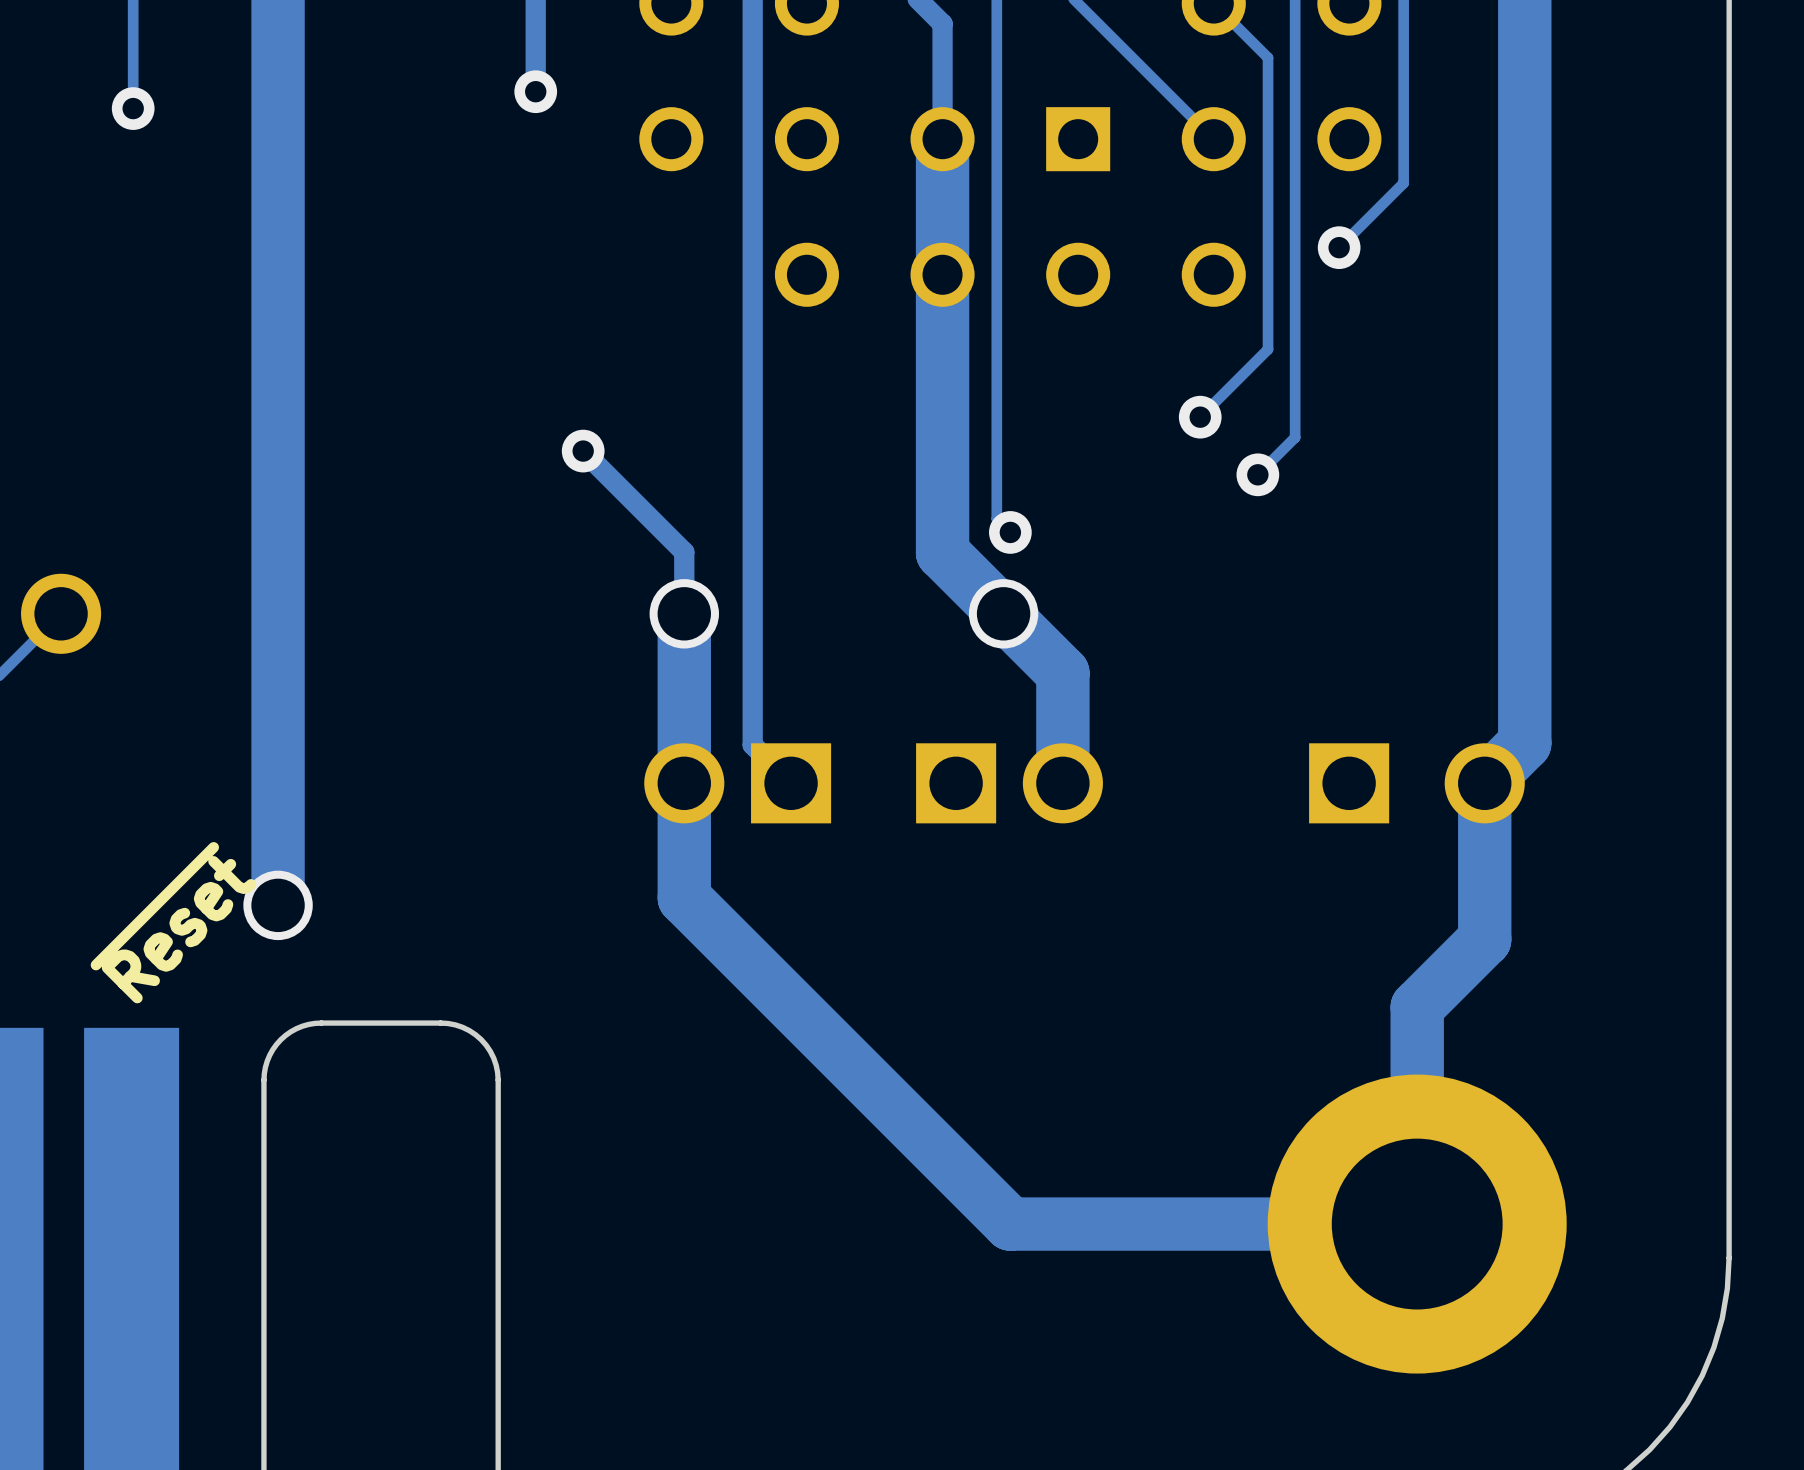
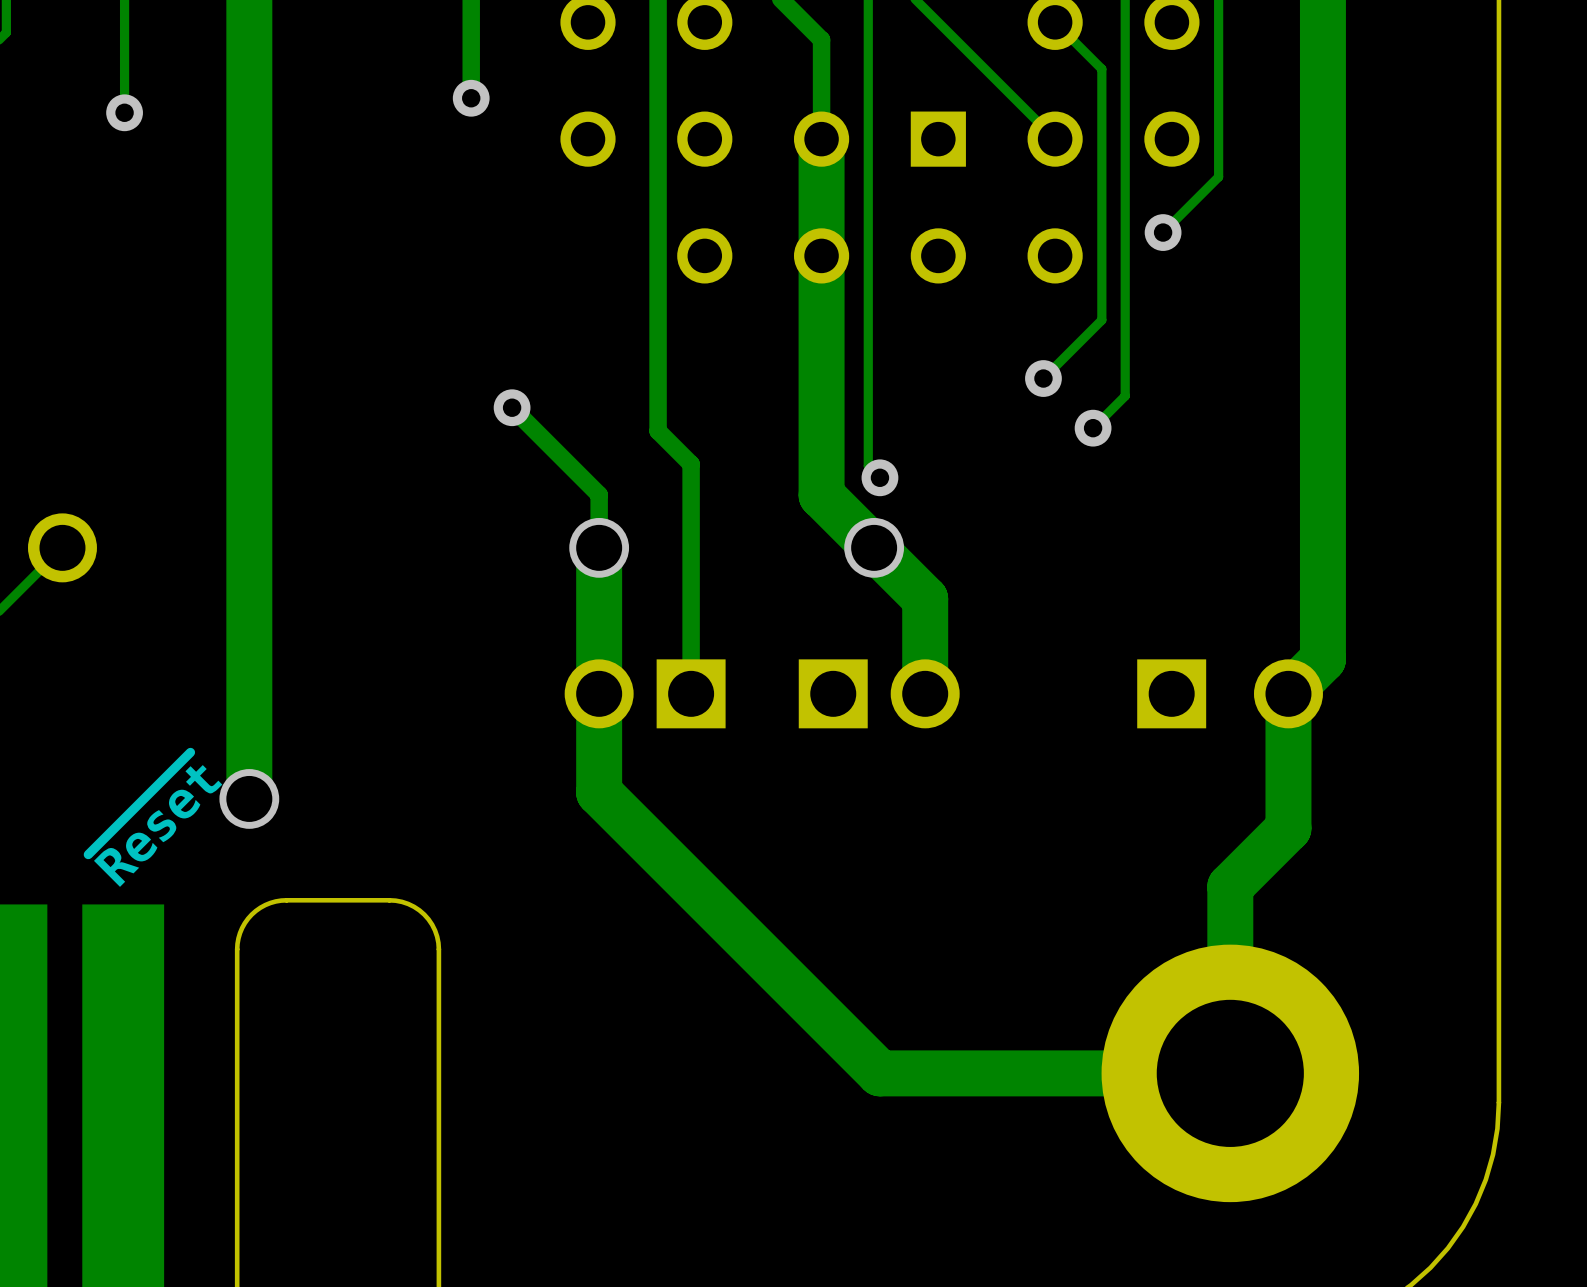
track: (752, 478) (752, 744) (791, 783) -> (658, 431) (691, 464) (691, 693)

